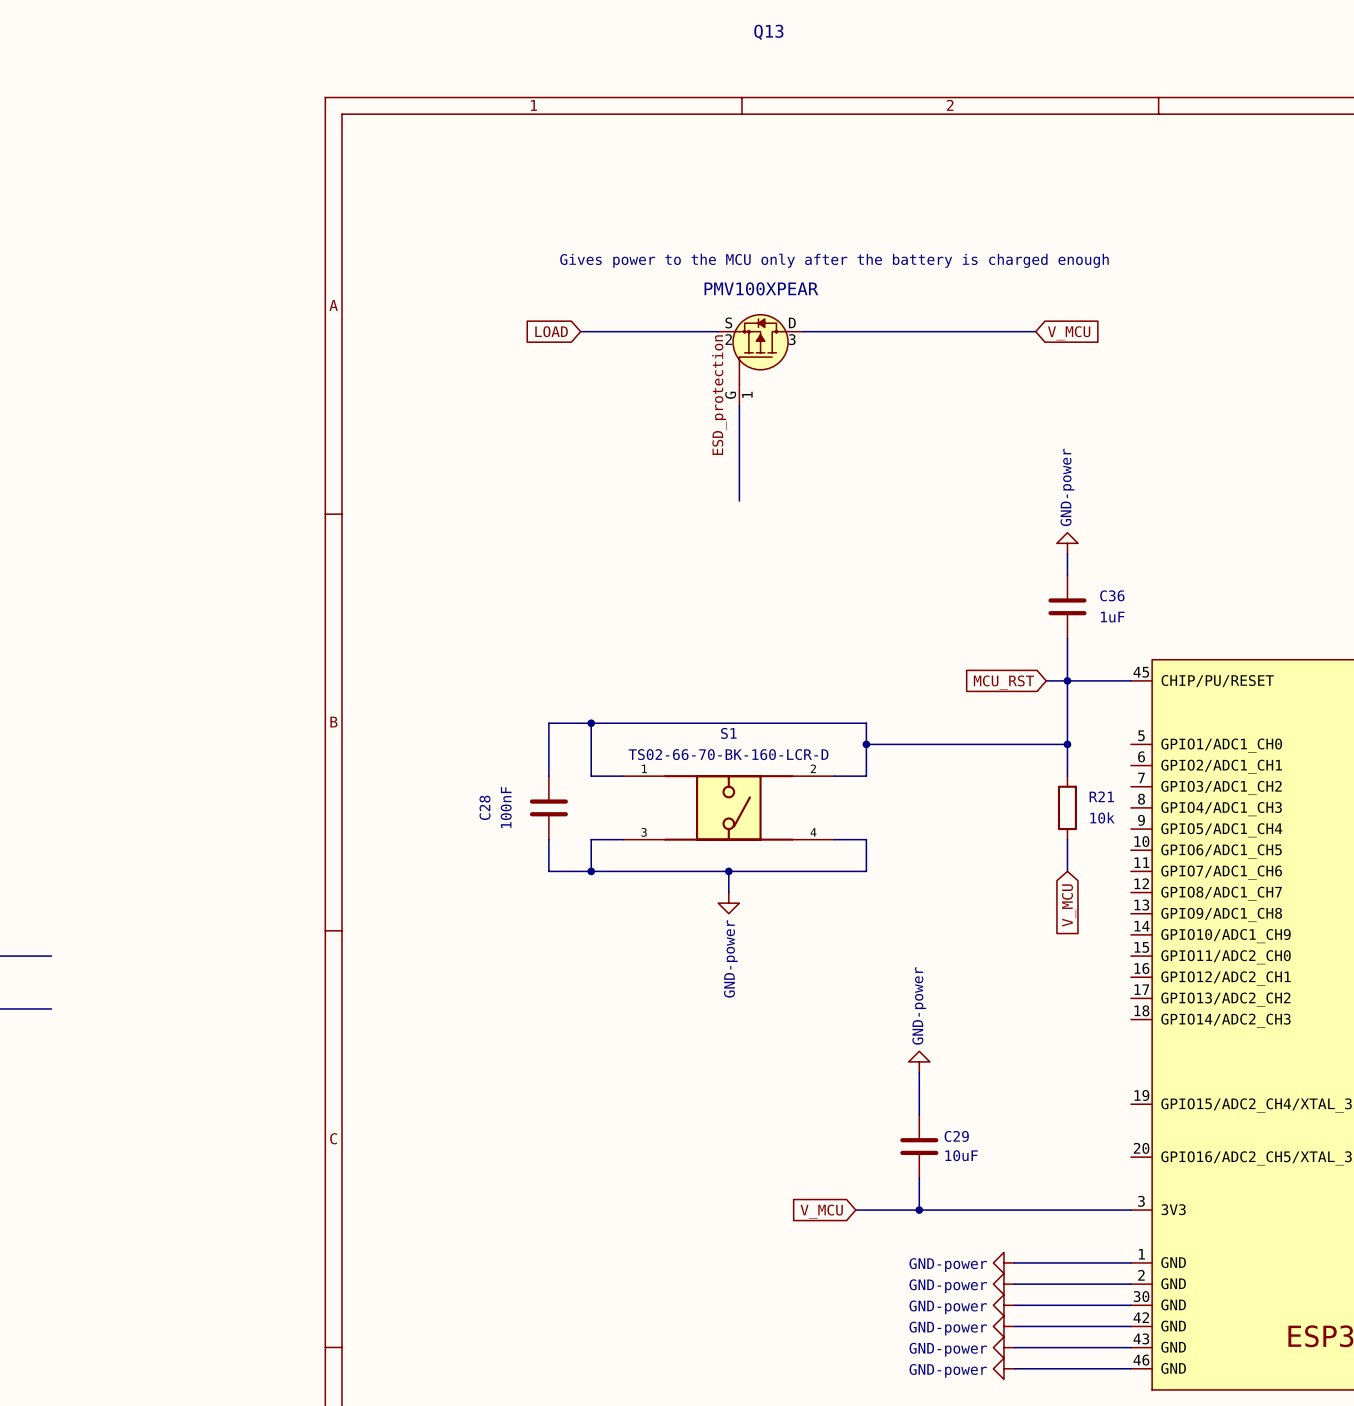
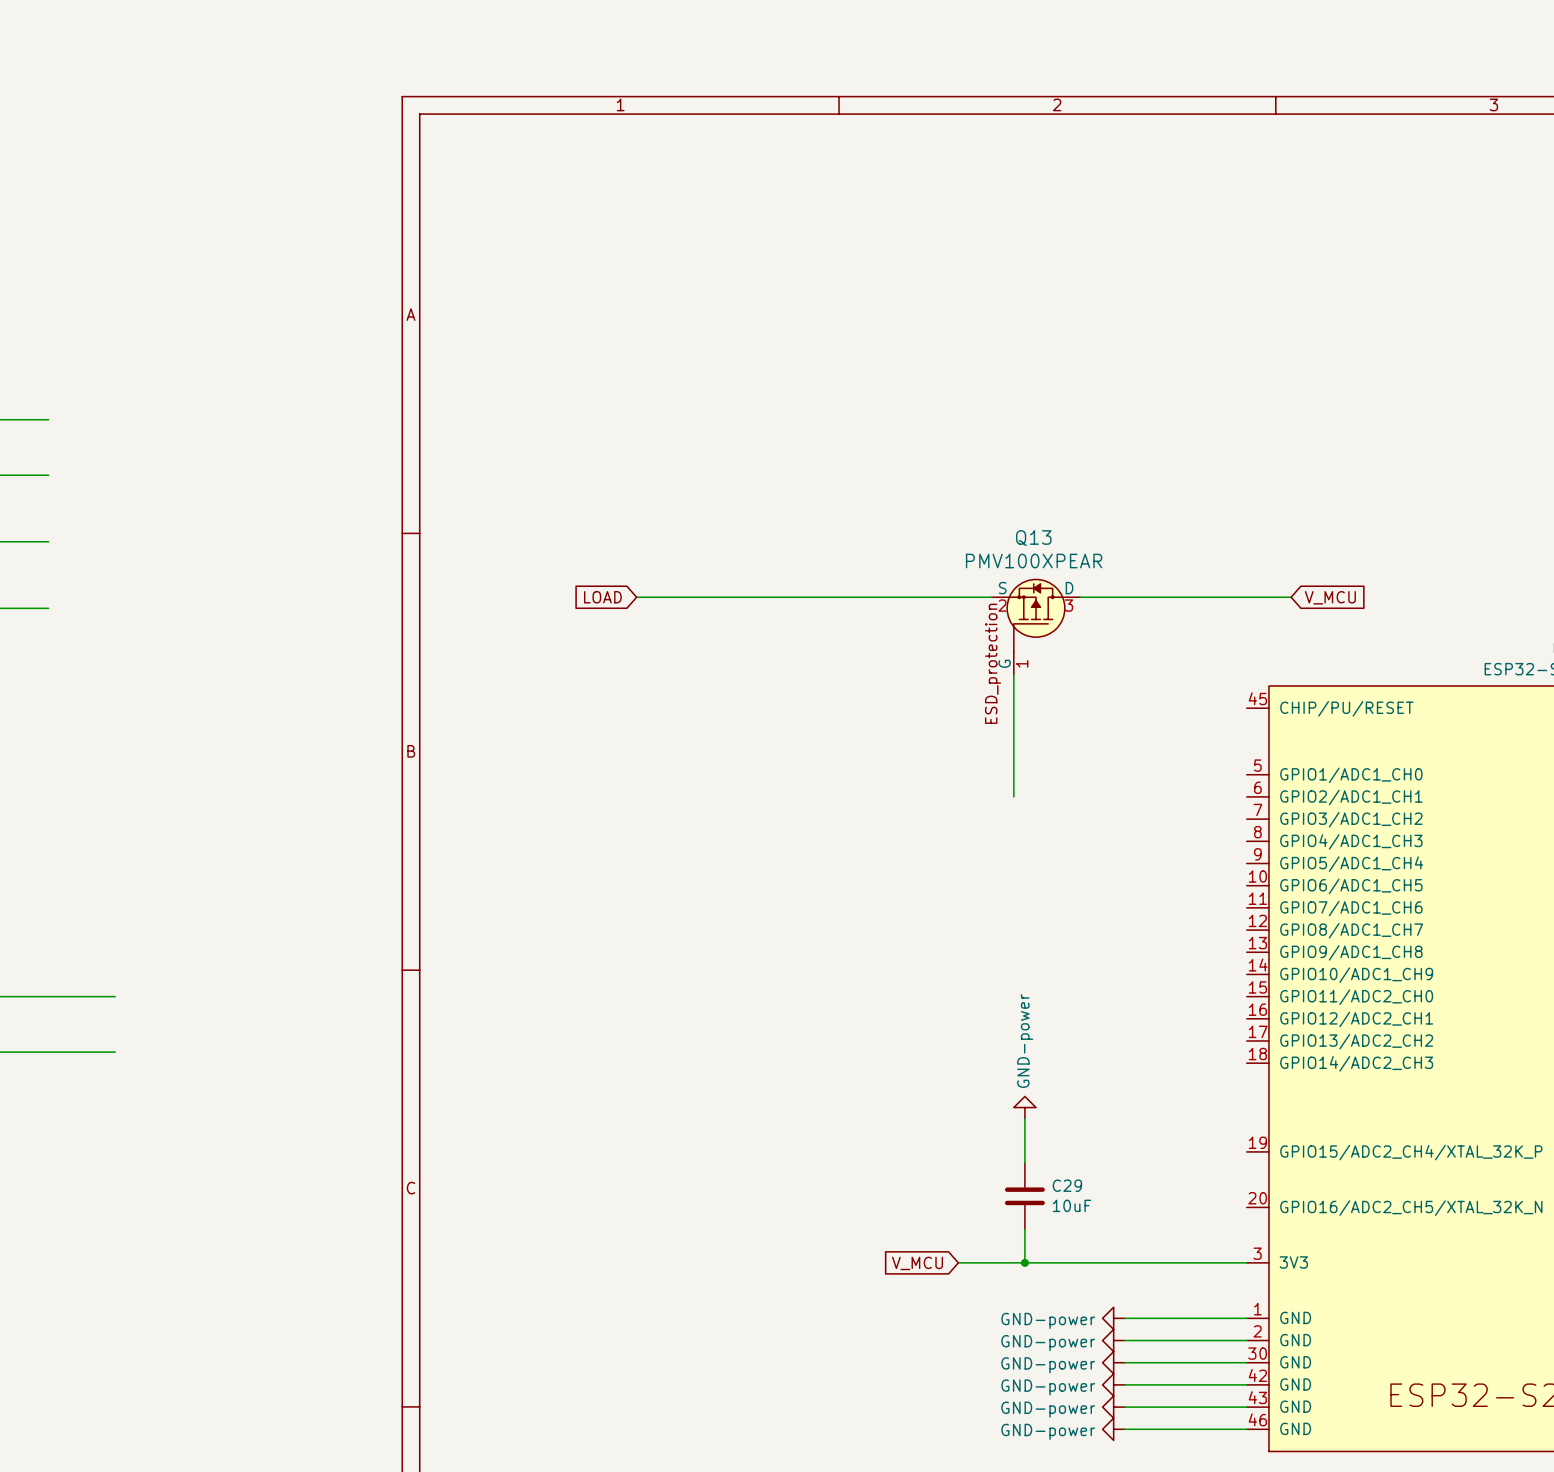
Q13 name position: Q13 (768, 32) -> Q13 (1033, 538)
text: Gives power to the MCU only after the battery is charged enough (834, 260) -> none
Q13 value position: PMV100XPEAR (761, 288) -> PMV100XPEAR (1034, 561)
global label: LOAD (551, 331) -> none
wire: (580, 331) (718, 331) -> none
wire: (802, 331) (1035, 331) -> none
global label: V_MCU (1069, 333) -> none
Q13 position: (760, 360) -> (1036, 627)
wire: (739, 405) (739, 501) -> none
power symbol: GND-power (1067, 543) -> none
wire: (1067, 553) (1067, 575) -> none
global label: none -> LOAD (602, 597)
wire: none -> (636, 597) (991, 597)
global label: none -> V_MCU (1330, 597)
C36: 1uF (1067, 606) -> none
wire: (1067, 638) (1067, 776) -> none
wire: none -> (1013, 674) (1013, 796)
wire: (1046, 680) (1130, 680) -> none
junction: (1067, 680) -> none
global label: MCU_RST (1003, 682) -> none
wire: (591, 723) (591, 776) (622, 776) -> none
junction: (591, 723) -> none
wire: (866, 744) (1067, 744) -> (1080, 597) (1291, 597)
junction: (866, 744) -> none
junction: (1067, 744) -> none
wire: (548, 776) (548, 723) (866, 723) (866, 776) (834, 776) -> none
C28: 100nF (548, 807) -> none
S1: TS02-66-70-BK-160-LCR-D (728, 807) -> none
R21: 10k (1067, 807) -> none
wire: (548, 839) (548, 871) (866, 871) (866, 839) (834, 839) -> none
wire: (622, 839) (591, 839) (591, 871) -> none
wire: (1067, 839) (1067, 871) -> none
junction: (591, 871) -> none
wire: (728, 871) (728, 892) -> none
junction: (728, 871) -> none
power symbol: GND-power (728, 903) -> none
global label: V_MCU (1069, 905) -> none

